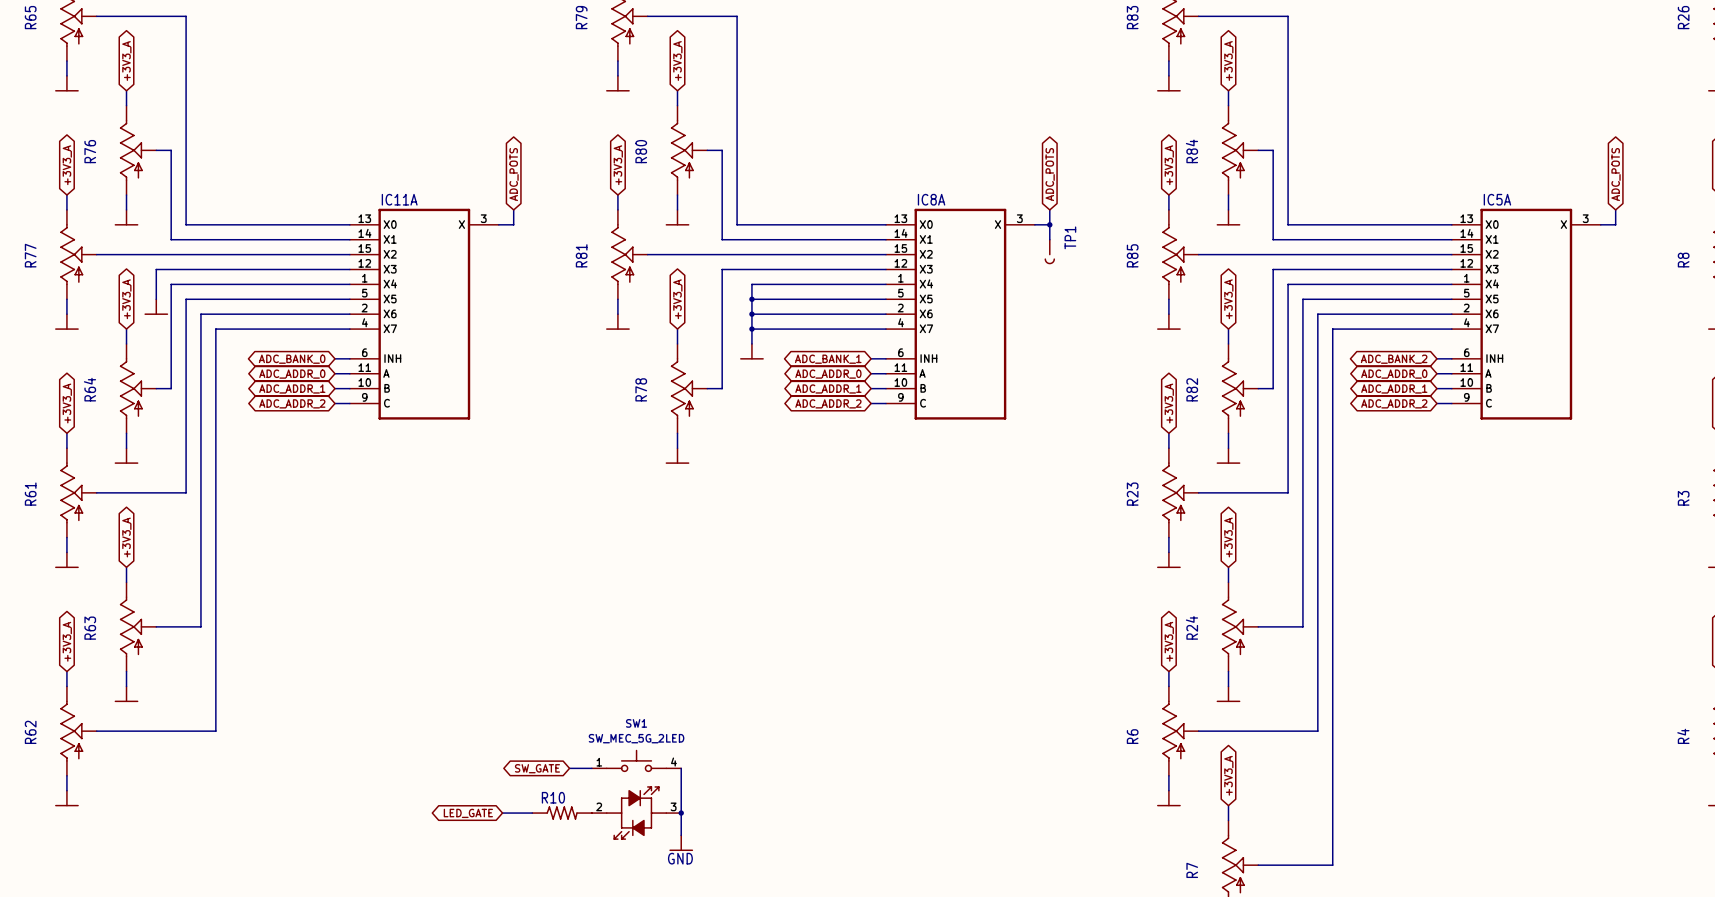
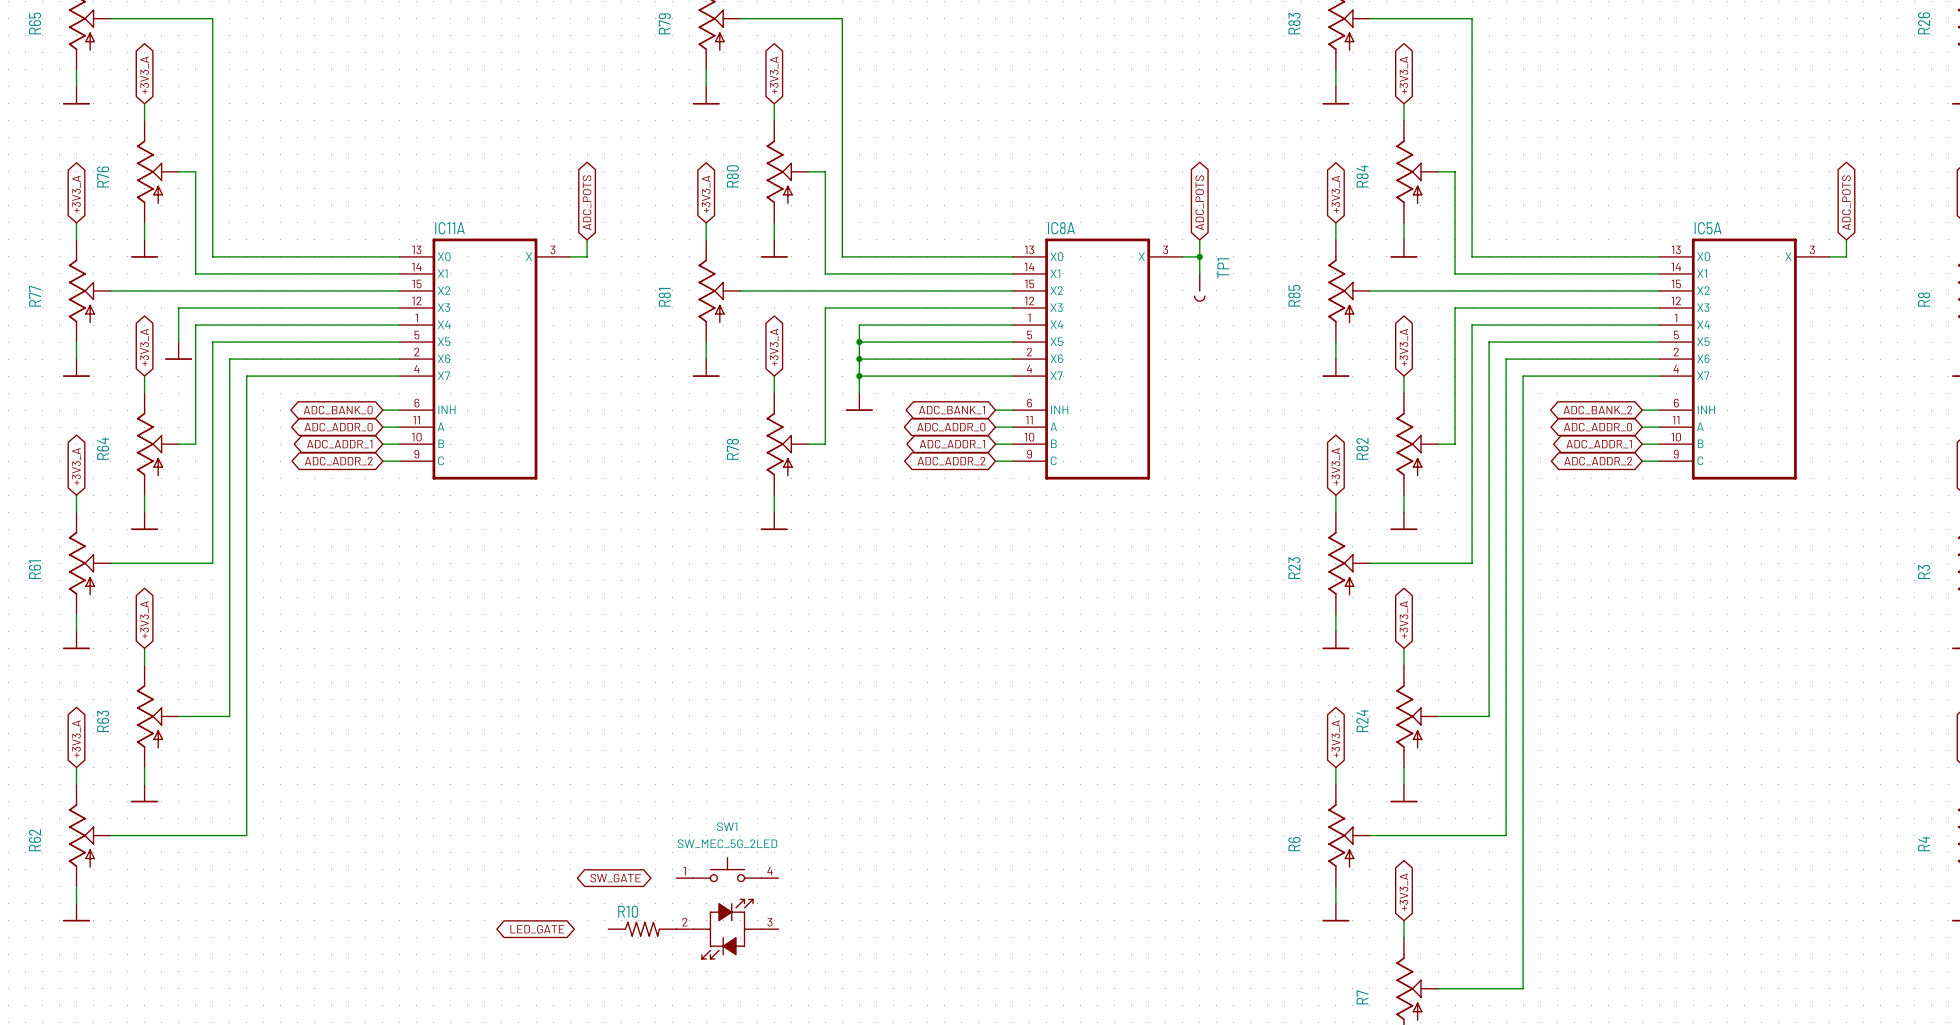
wire: (569, 768) (591, 768) -> none
wire: (681, 768) (681, 835) -> none
wire: (502, 813) (532, 813) -> none
junction: (681, 813) -> none
power symbol: GND (681, 843) -> none

